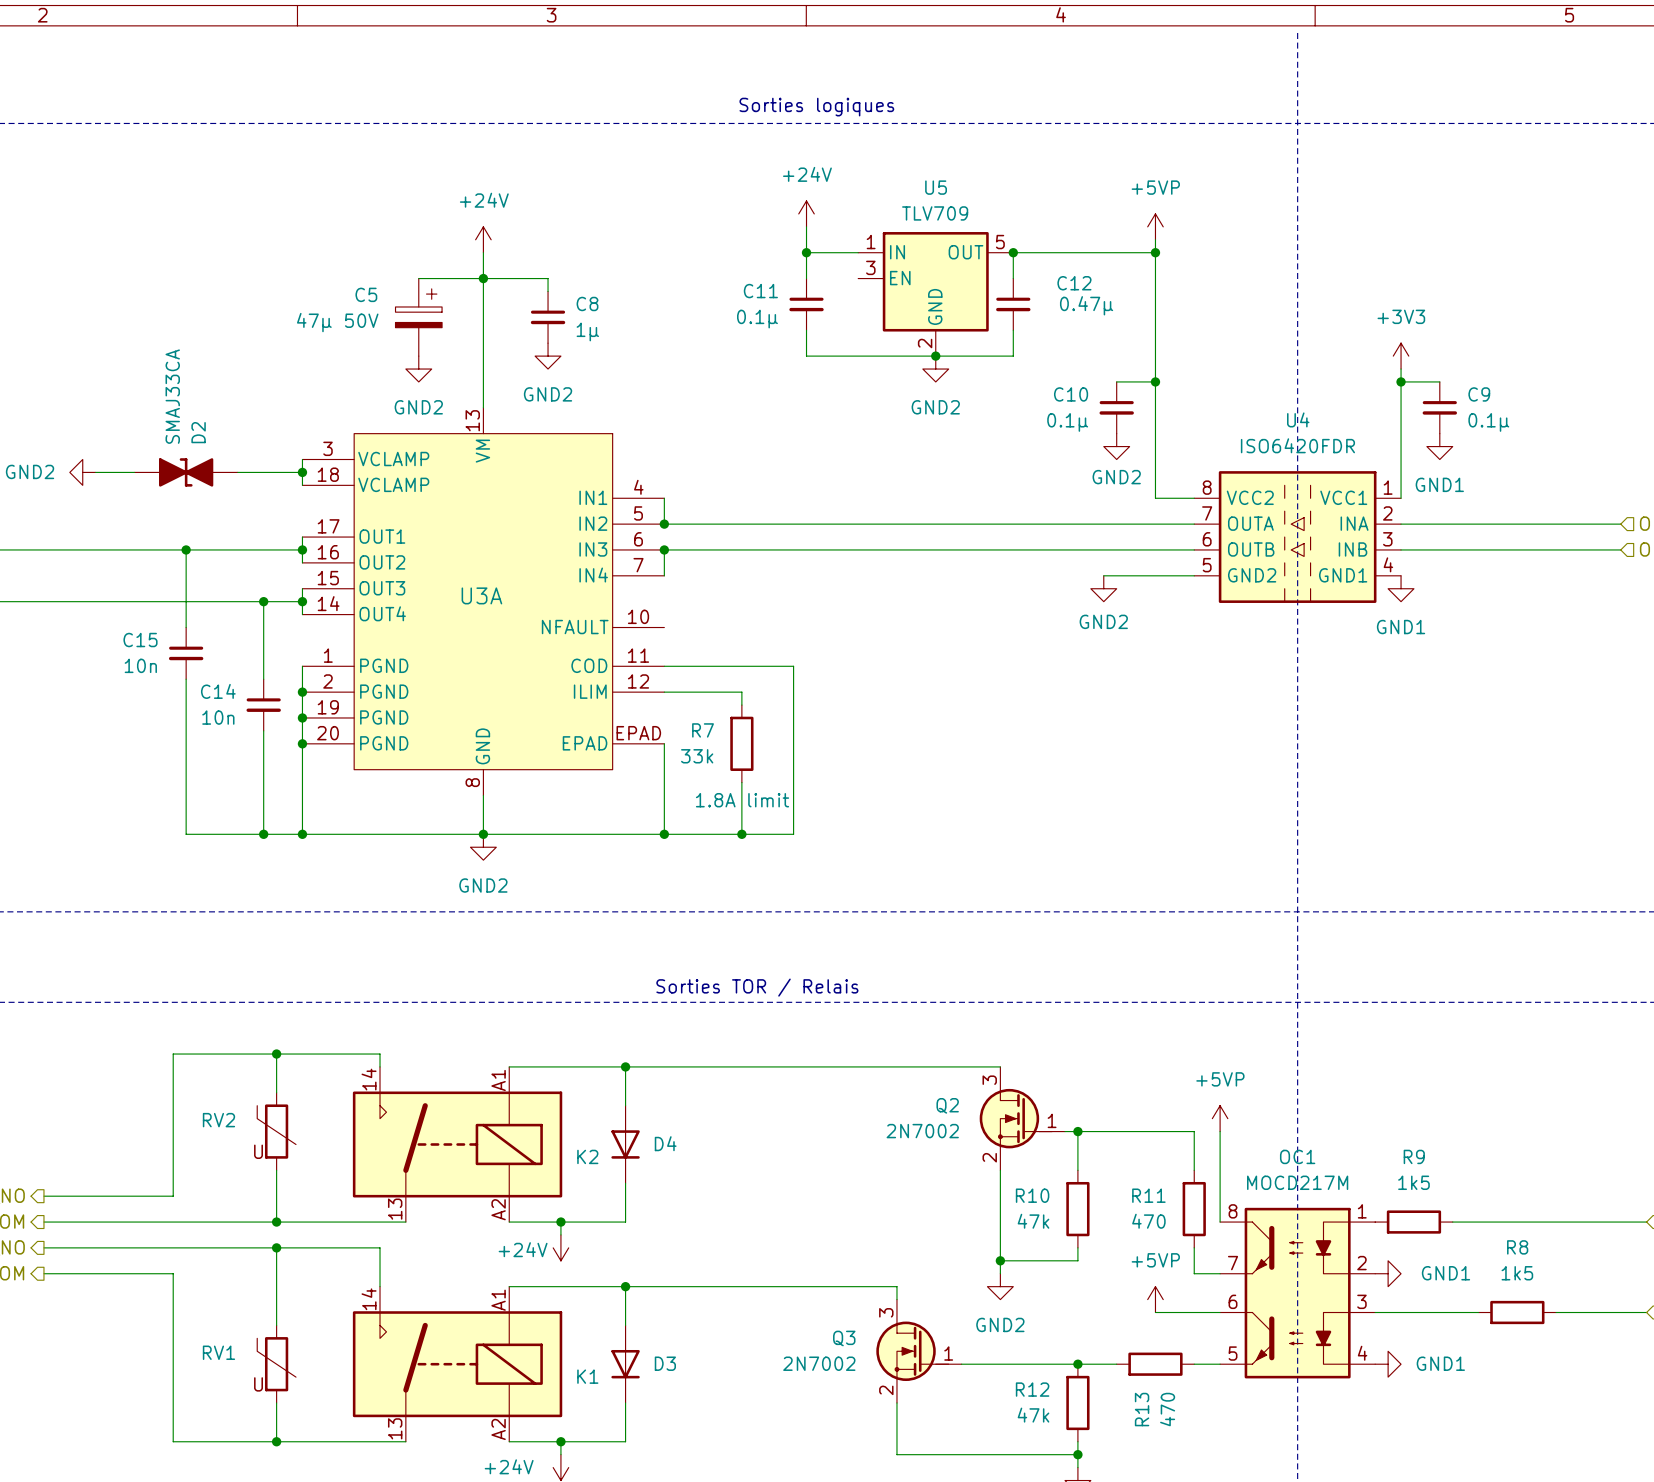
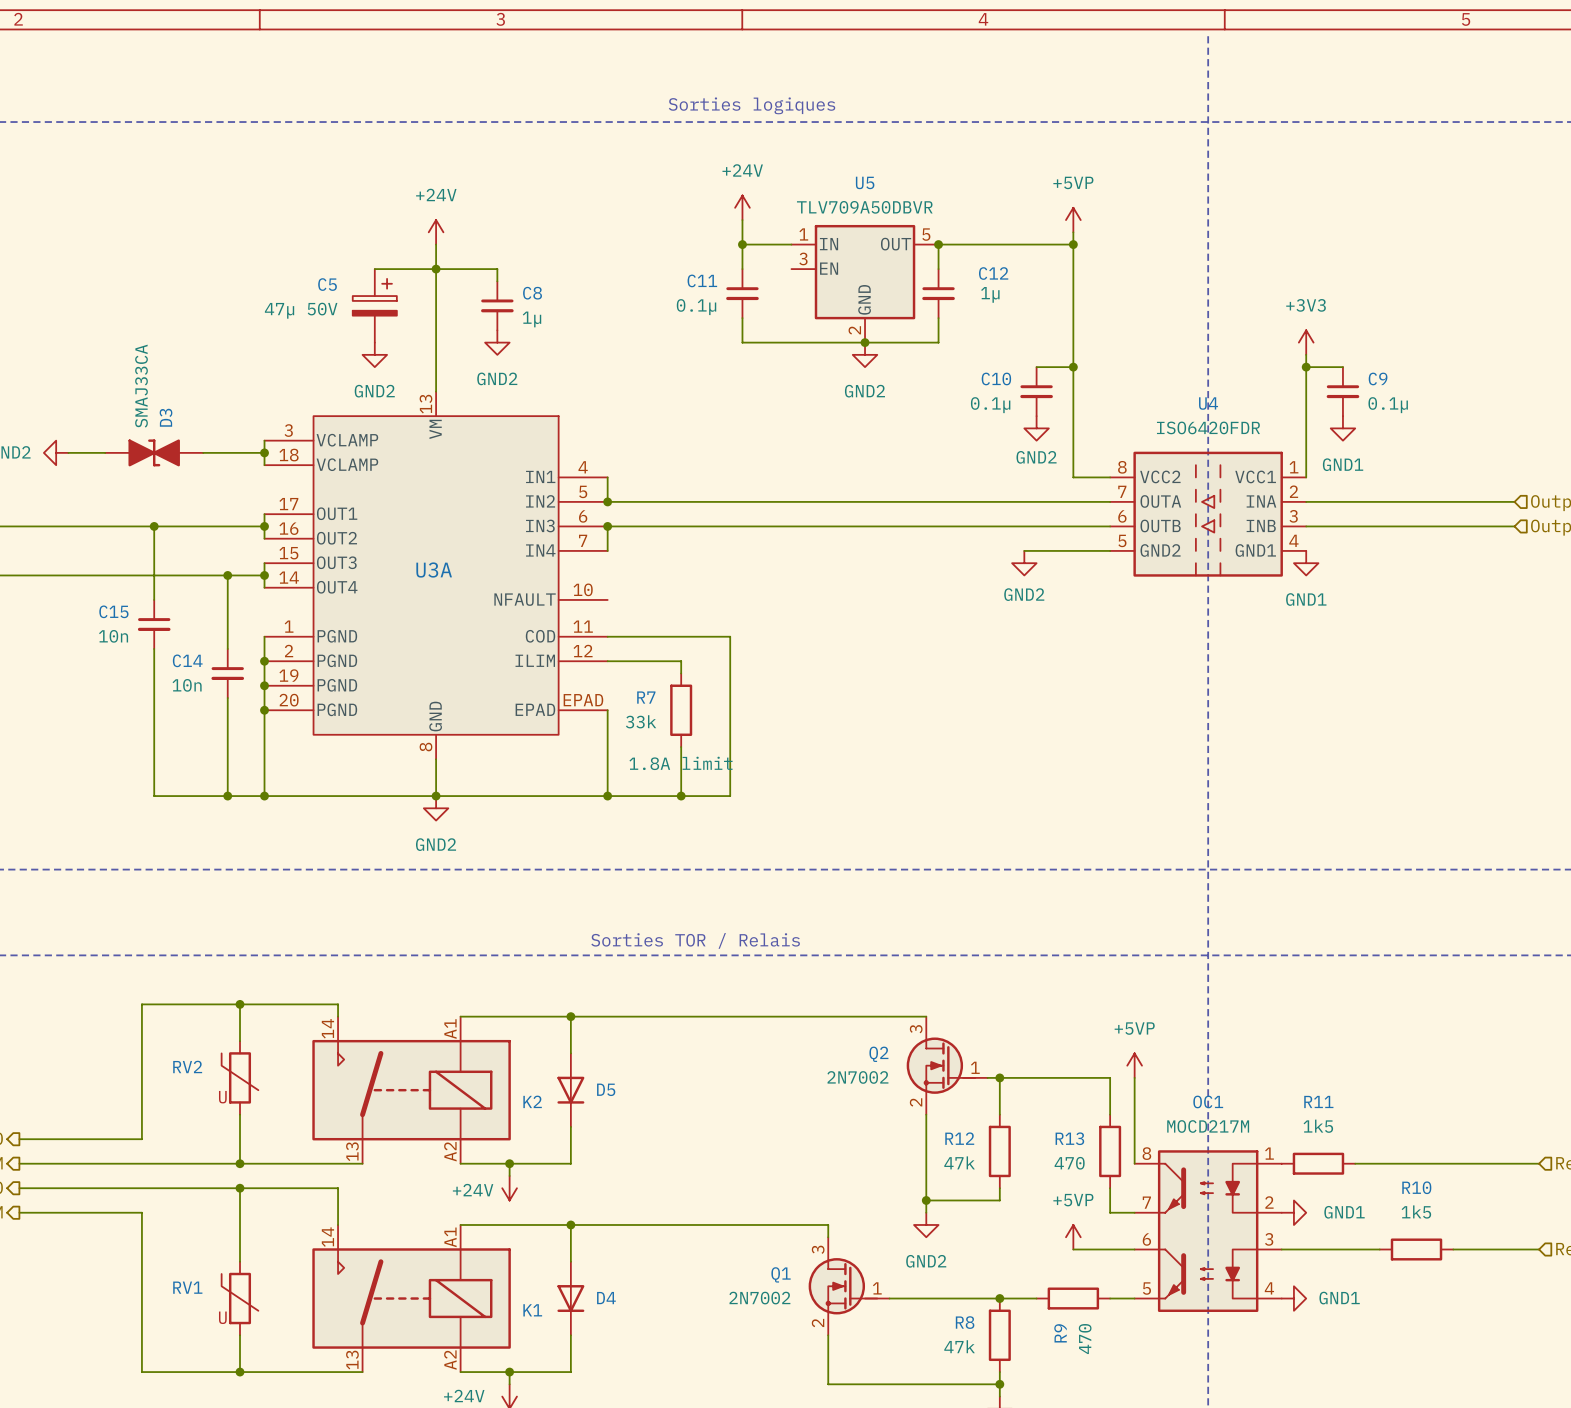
U5 value: TLV709 (935, 213) -> TLV709A50DBVR (864, 207)
C12 value: 0.47µ (1086, 305) -> 1µ (990, 294)
D2 name: D2 (198, 432) -> D3 (166, 417)
D4 name: D4 (665, 1143) -> D5 (606, 1089)
R9 name: R9 (1414, 1156) -> R11 (1318, 1101)
R10 name: R10 (1032, 1195) -> R12 (959, 1138)
R11 name: R11 (1148, 1195) -> R13 (1069, 1138)
R8 name: R8 (1517, 1247) -> R10 (1416, 1187)
Q3 name: Q3 (844, 1338) -> Q1 (781, 1274)
D3 name: D3 (665, 1363) -> D4 (606, 1298)
R12 name: R12 (1032, 1389) -> R8 (965, 1322)
R13 name: R13 (1142, 1409) -> R9 (1060, 1333)

